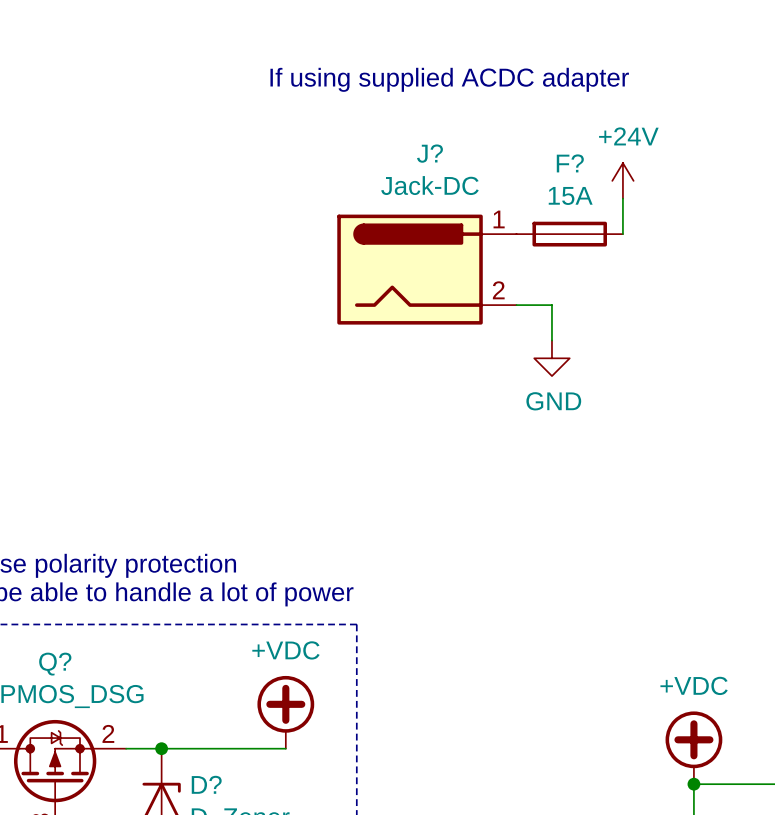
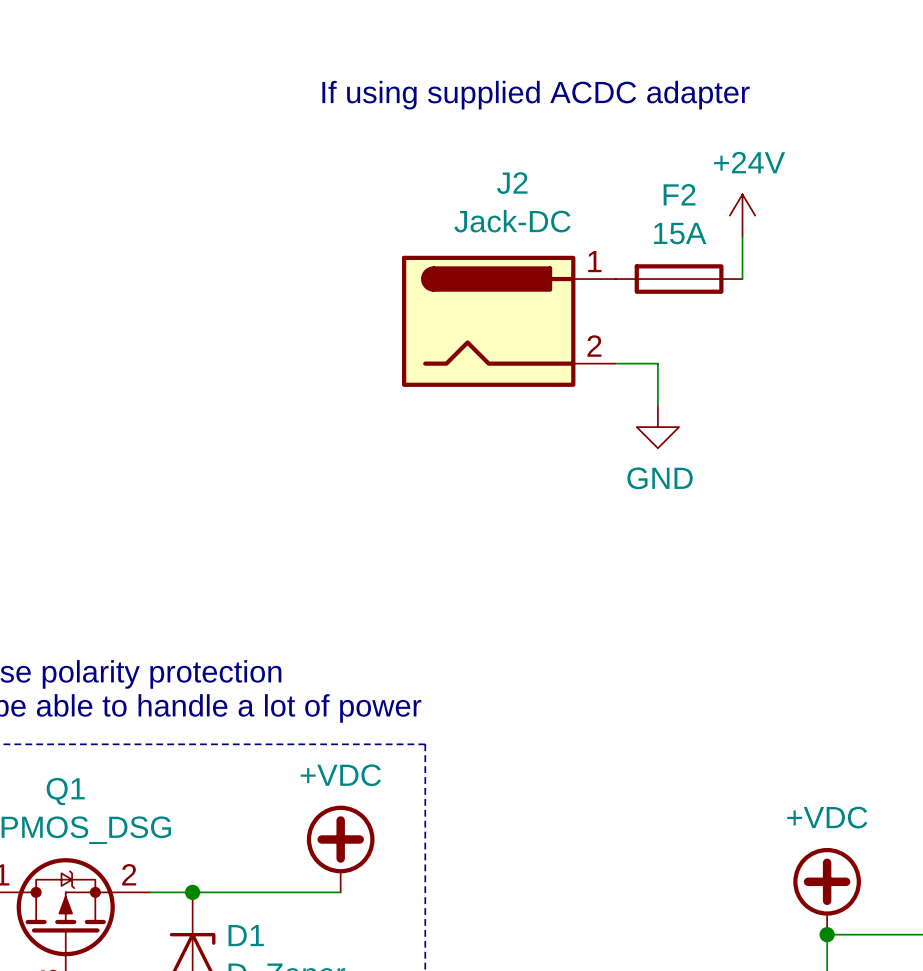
J? name: J? (429, 153) -> J2 (512, 183)
F? name: F? (570, 163) -> F2 (679, 194)
Q? name: Q? (55, 664) -> Q1 (65, 791)
D? name: D? (206, 784) -> D1 (246, 935)

